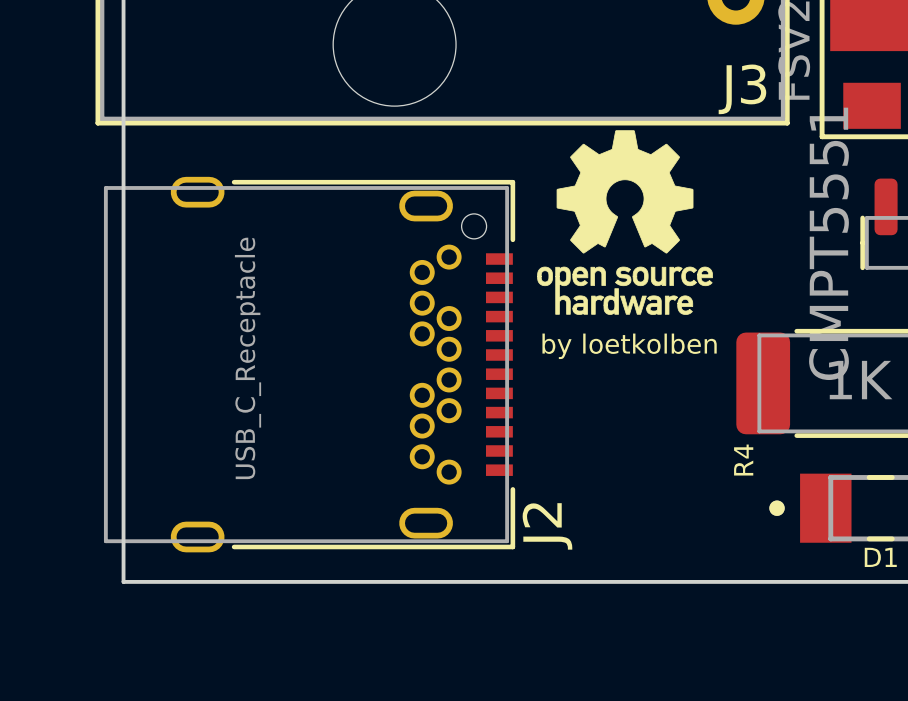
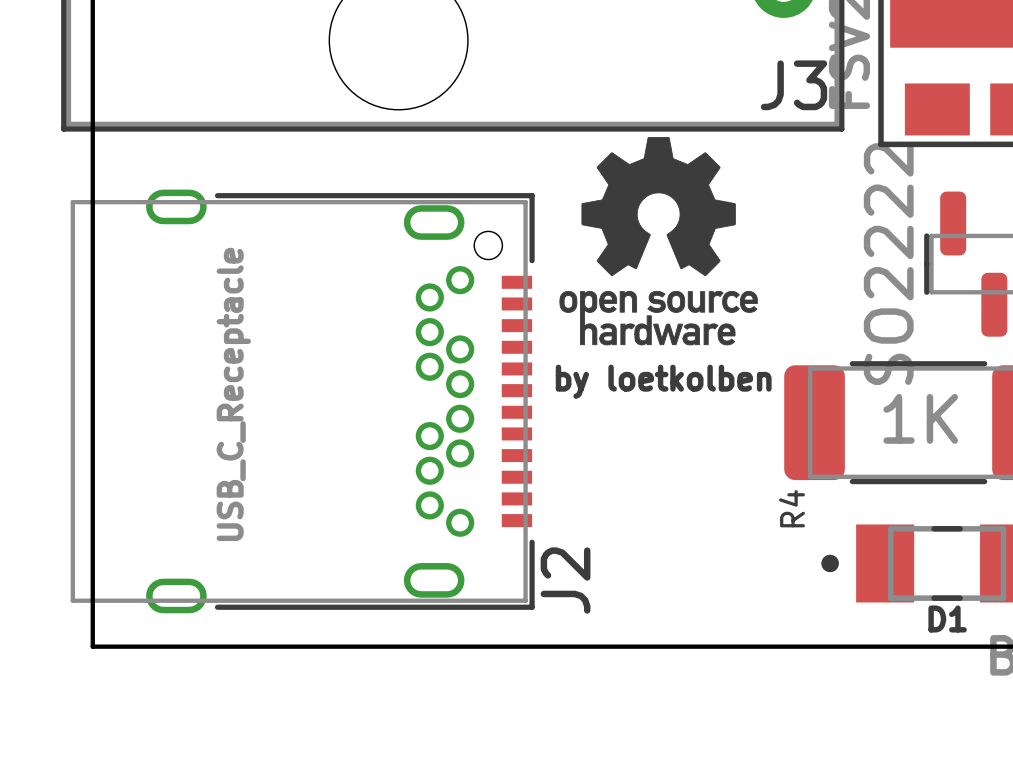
part value: CMPT5551 (828, 243) -> SO2222 (888, 264)

